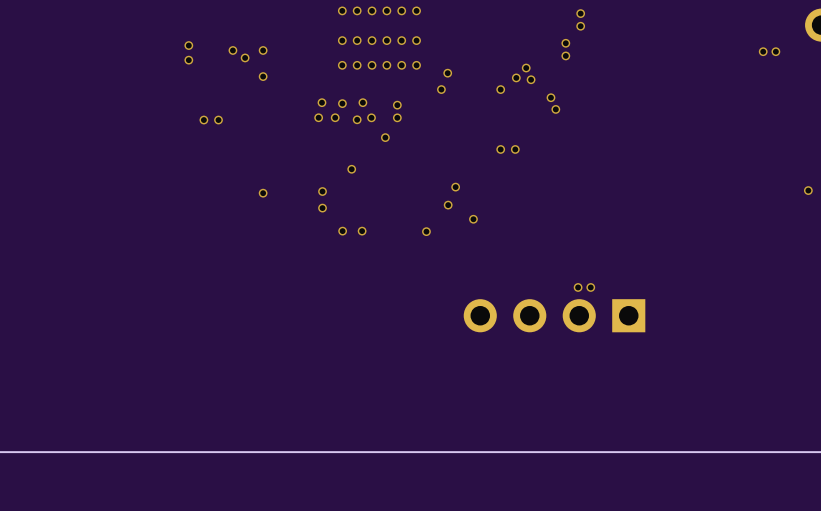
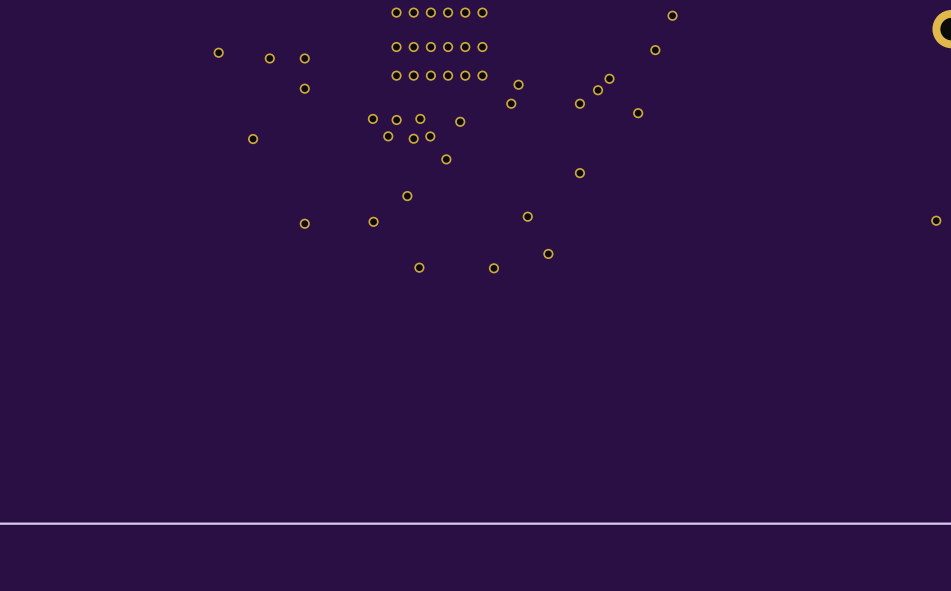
via: (580, 26) -> none
via: (763, 51) -> none
via: (775, 51) -> none
via: (565, 55) -> none
via: (245, 57) -> none
via: (188, 60) -> none
via: (531, 79) -> none
via: (555, 109) -> none
via: (318, 117) -> none
via: (397, 117) -> none
via: (203, 120) -> none
via: (515, 149) -> none
via: (448, 205) -> none
via: (322, 208) -> none
via: (342, 231) -> none
via: (578, 287) -> none
via: (590, 287) -> none
part: (554, 315) -> none

